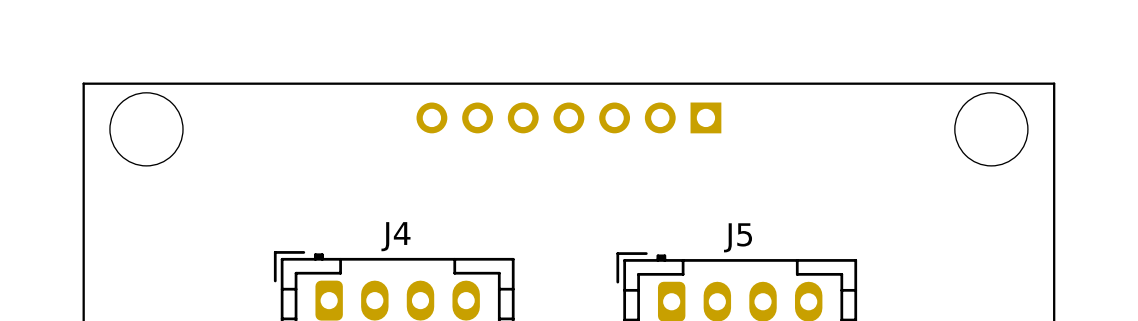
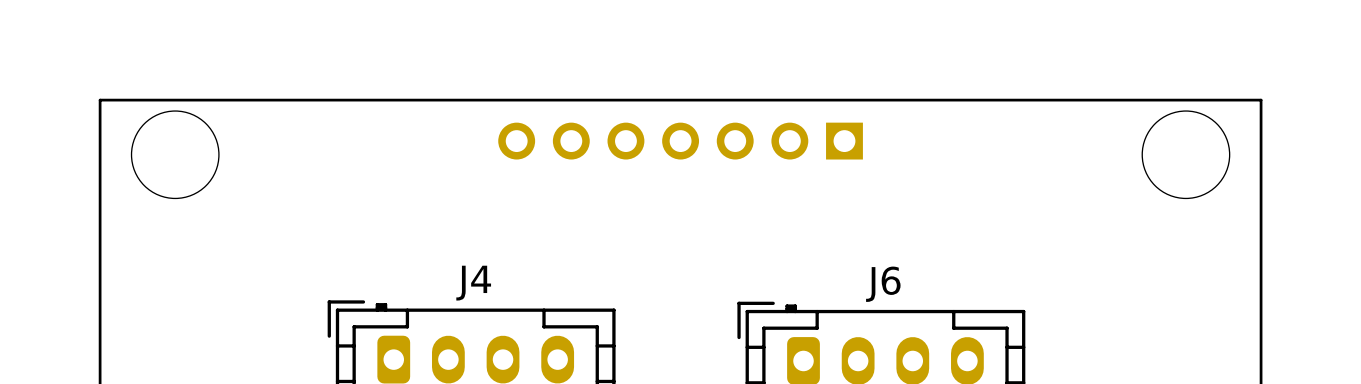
J5 name: J5 (738, 237) -> J6 (883, 284)

